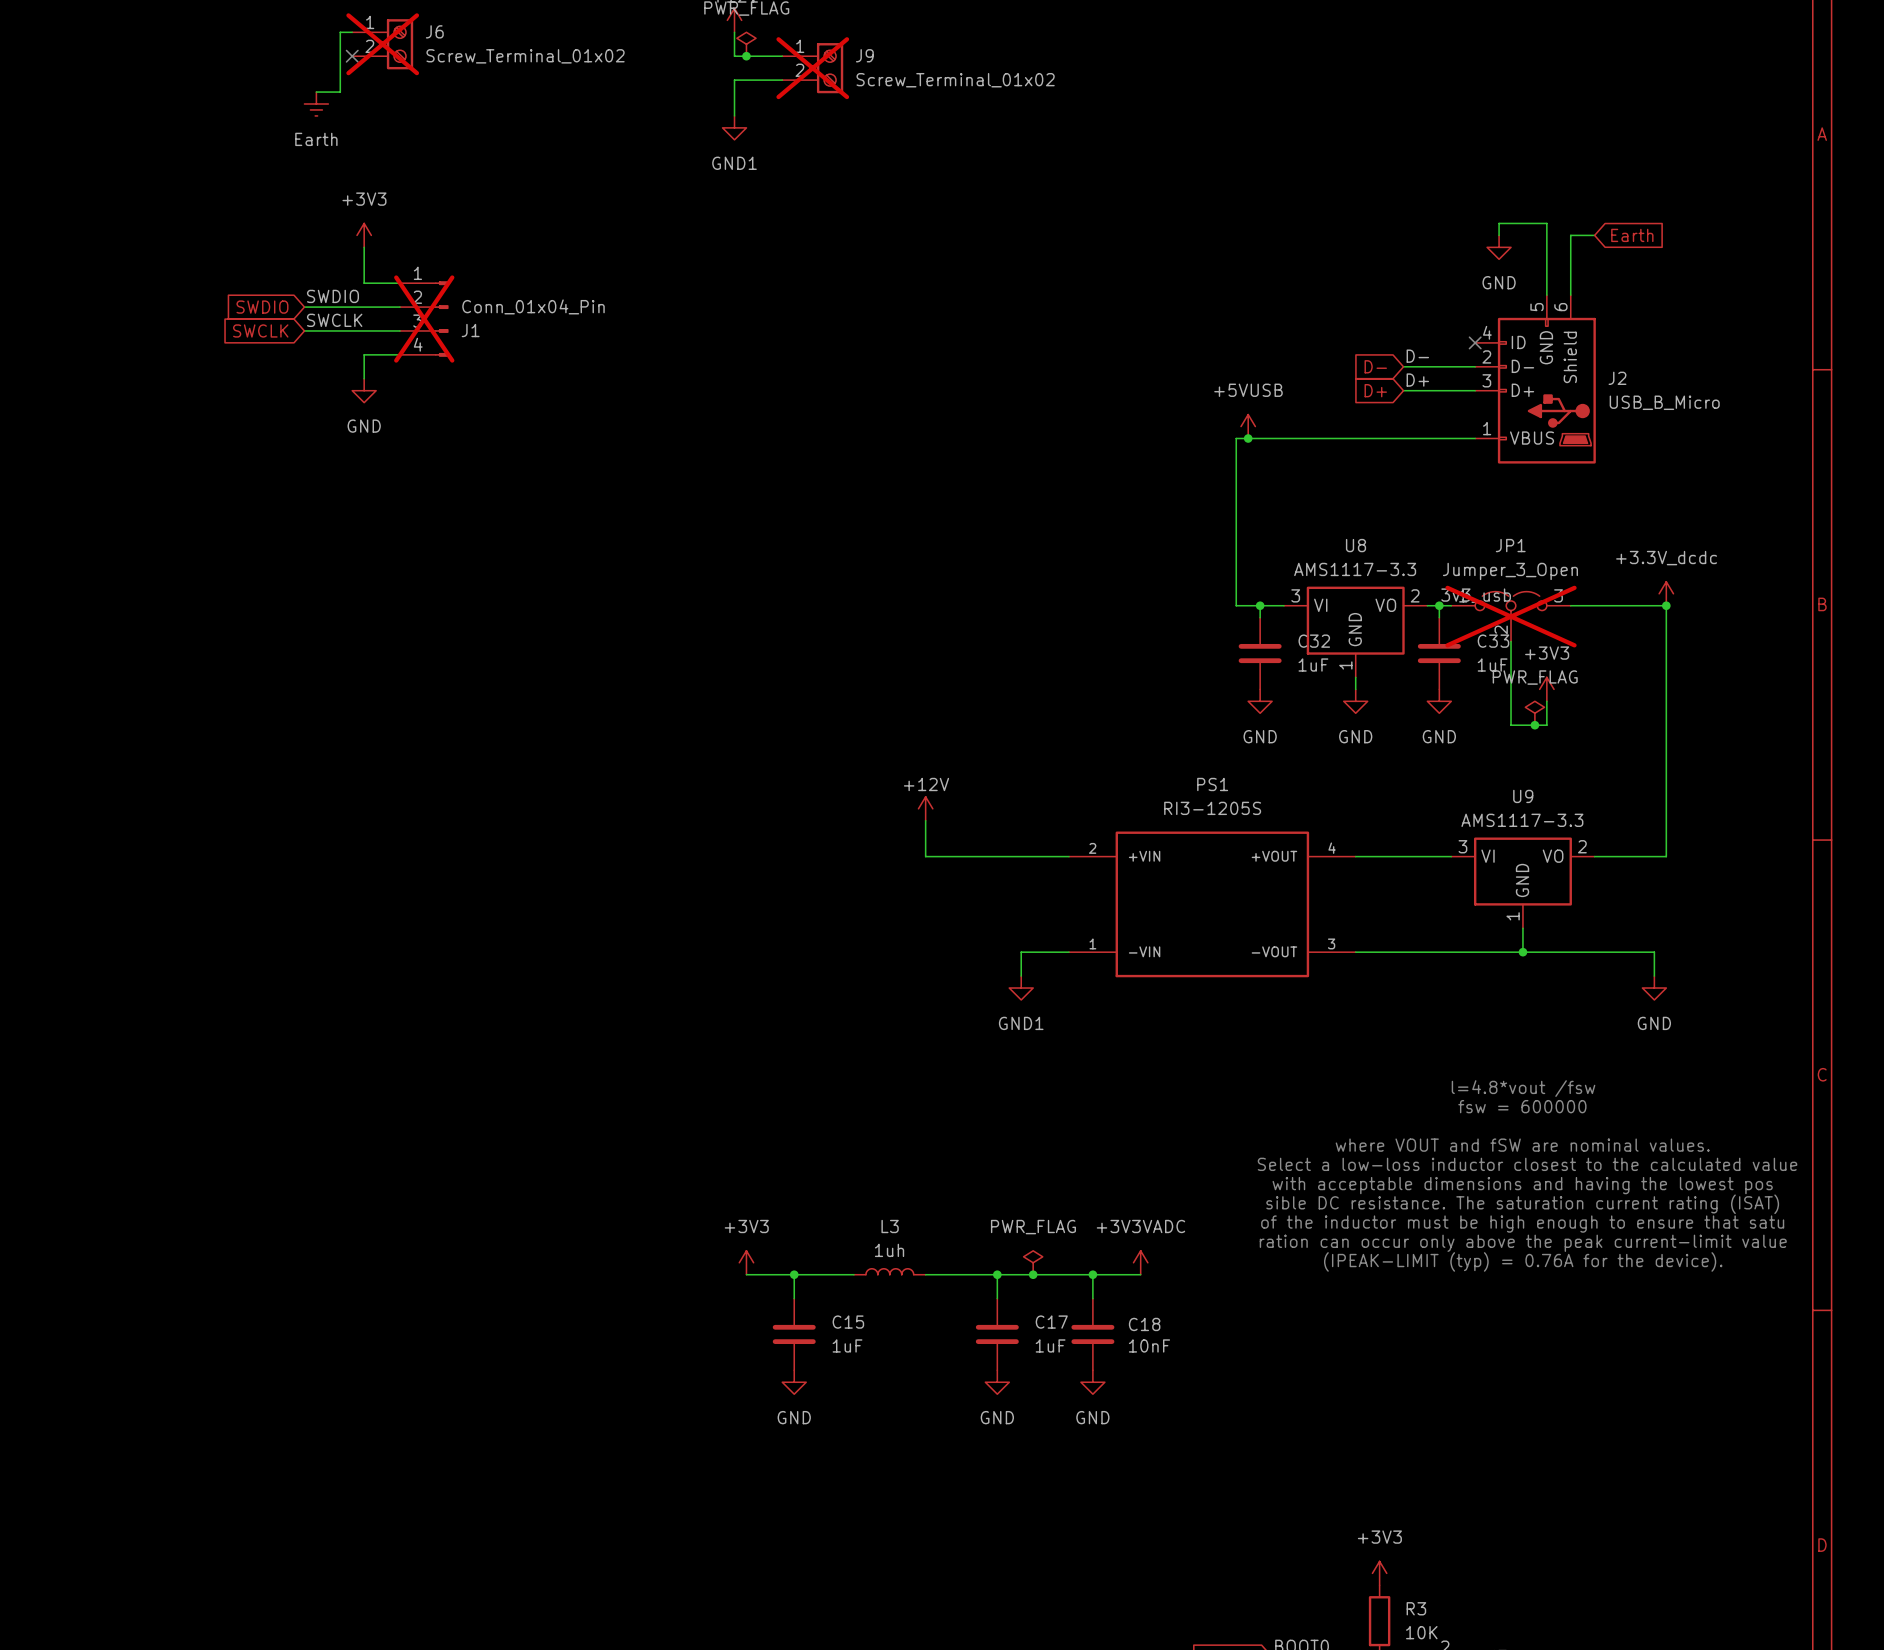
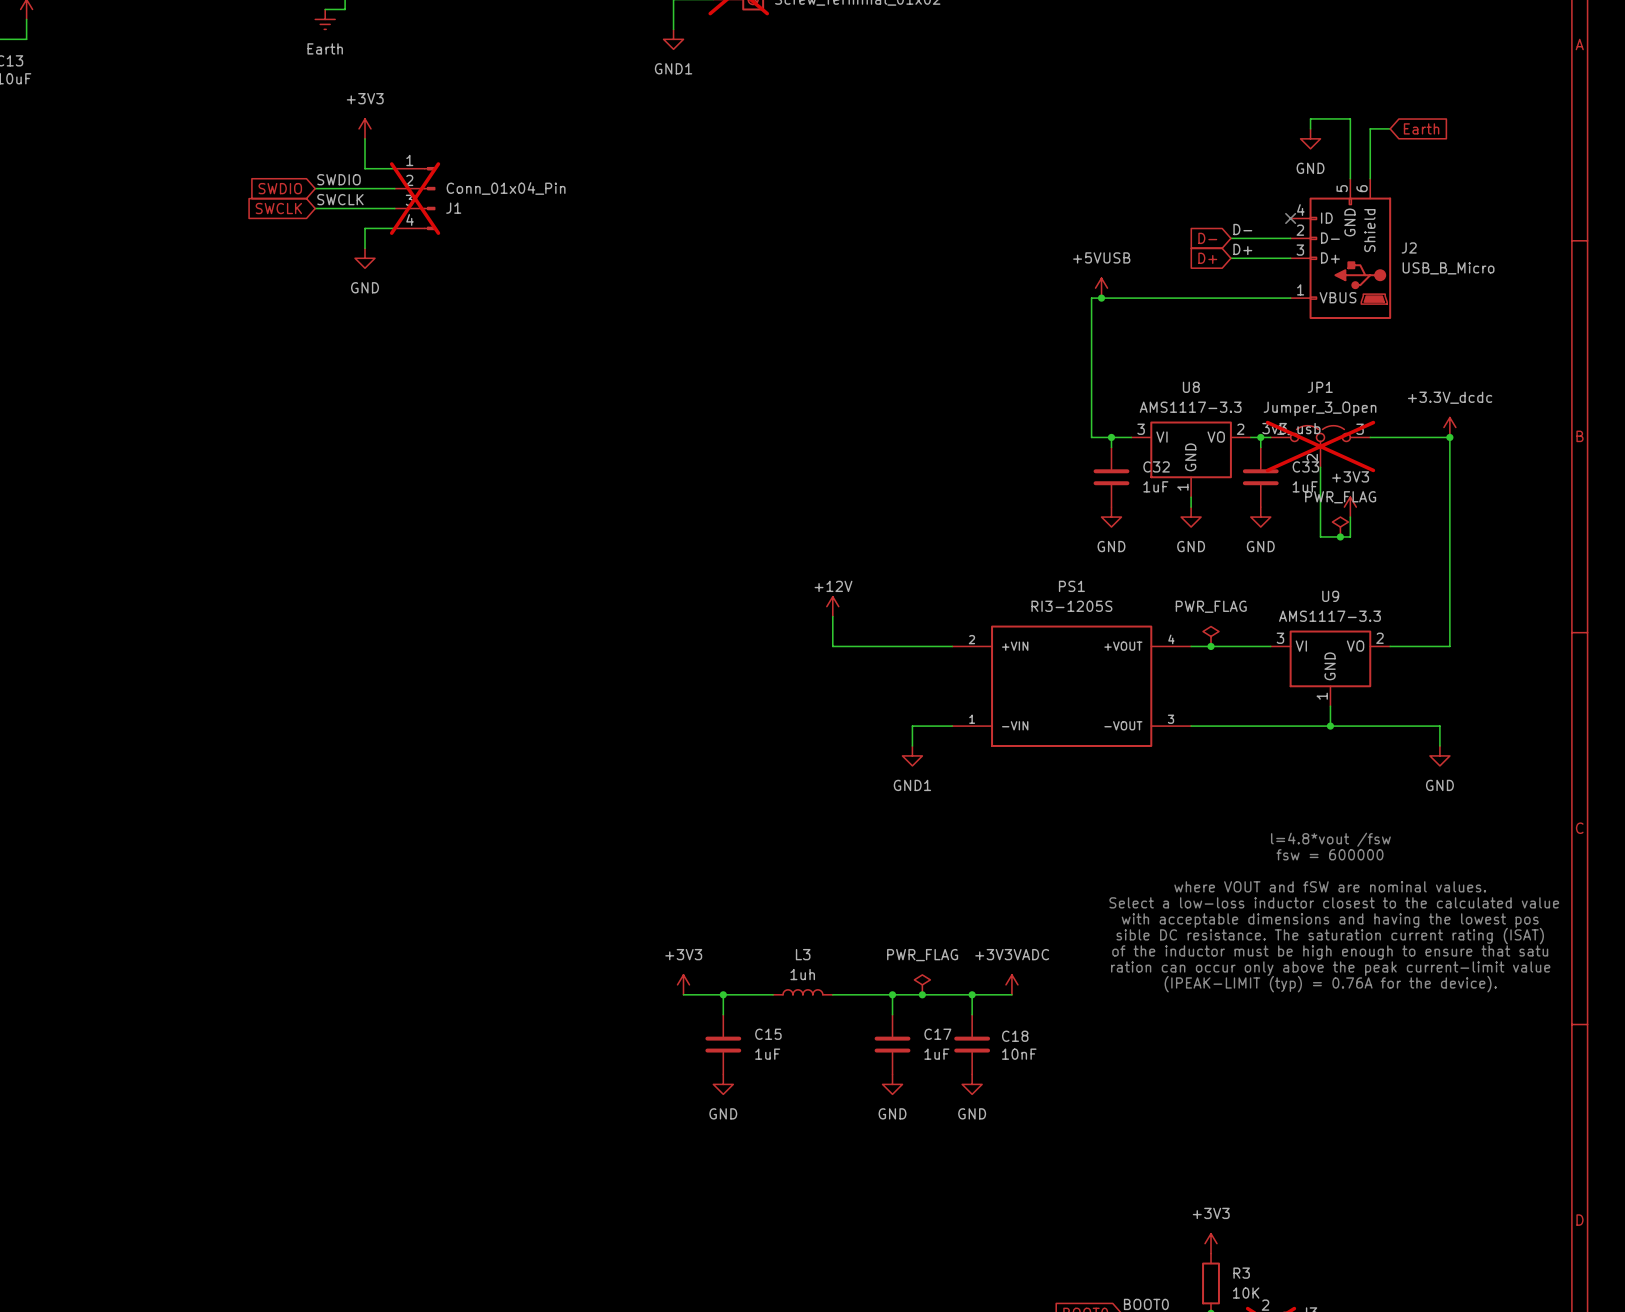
power symbol: none -> PWR_FLAG (1211, 636)
junction: none -> (1211, 646)

